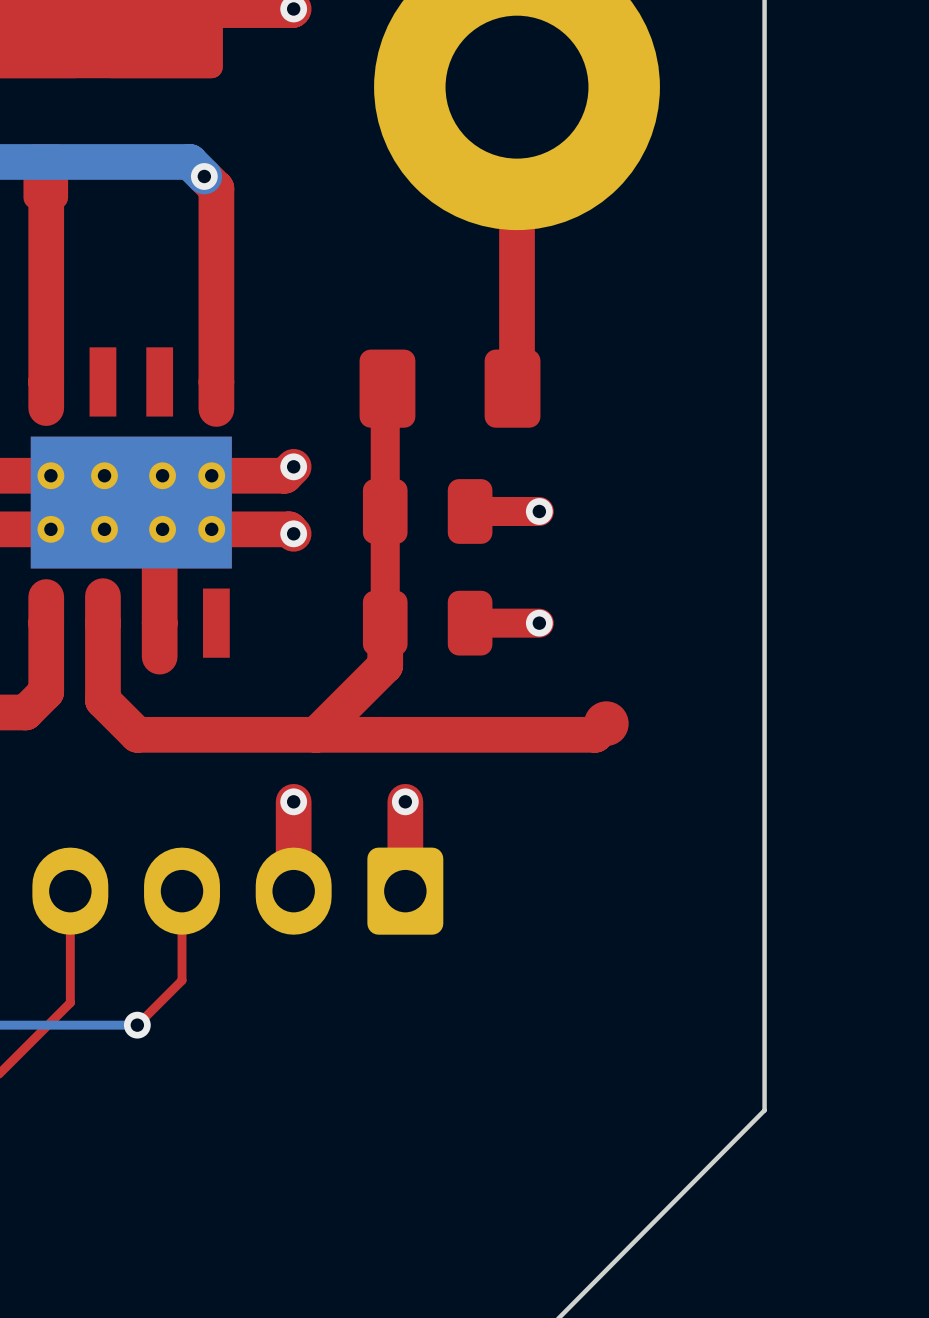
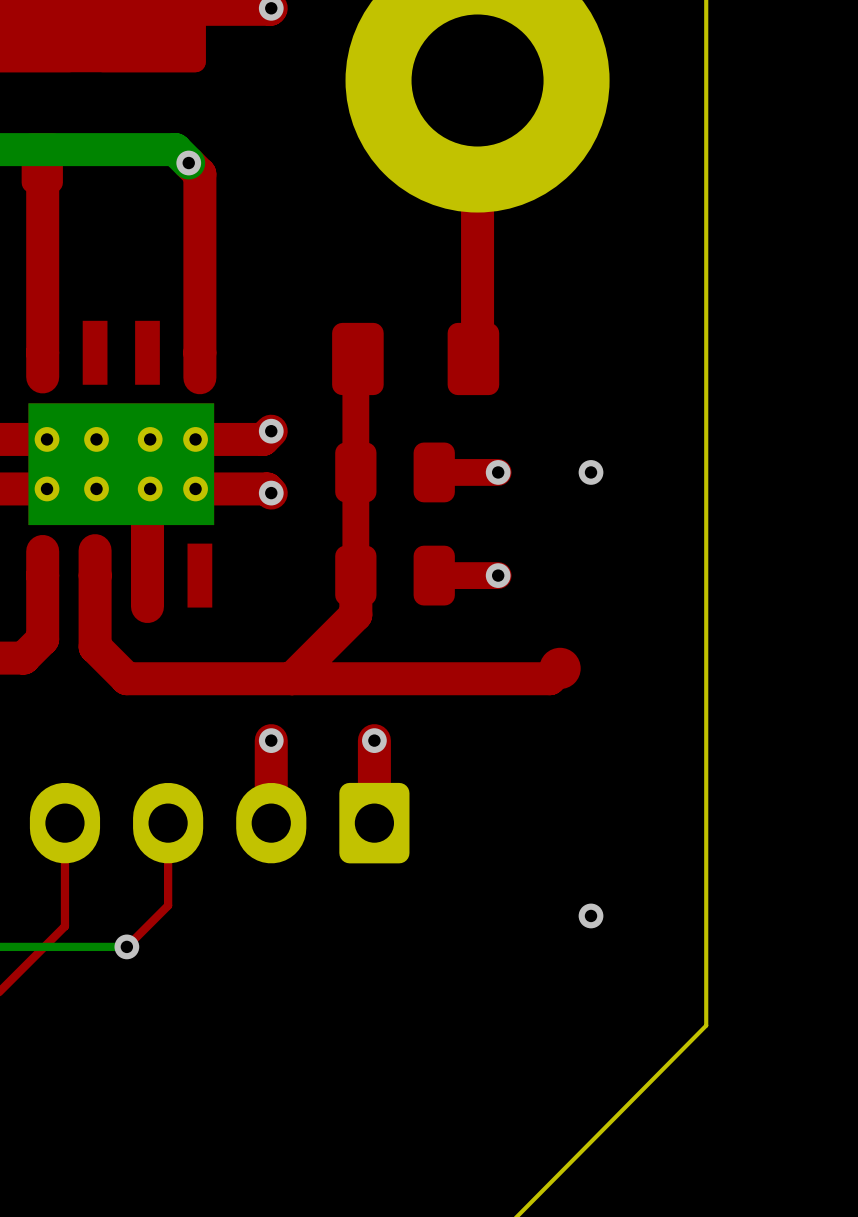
via: none -> (591, 472)
via: none -> (591, 915)

